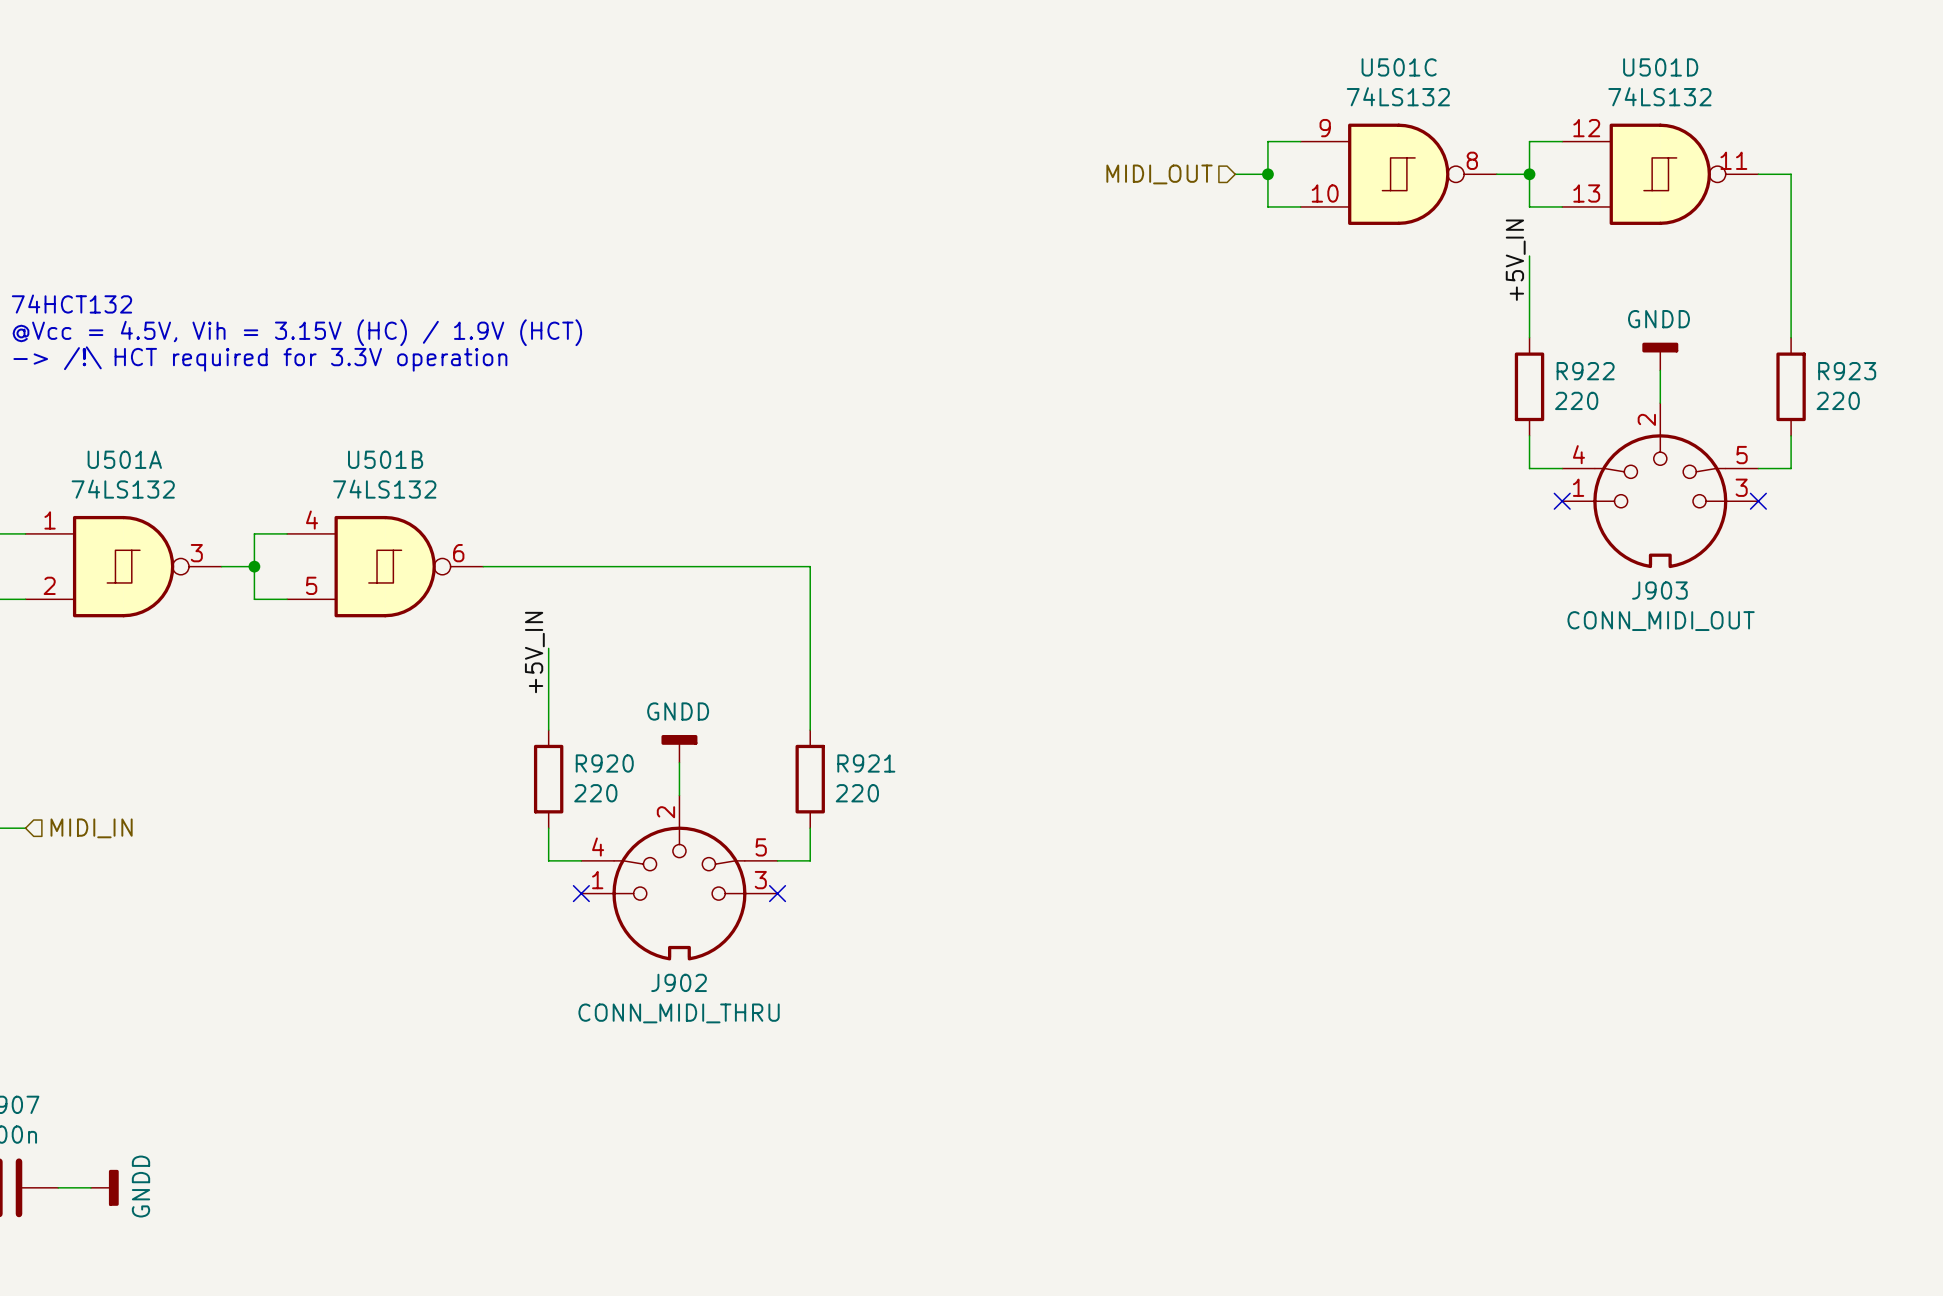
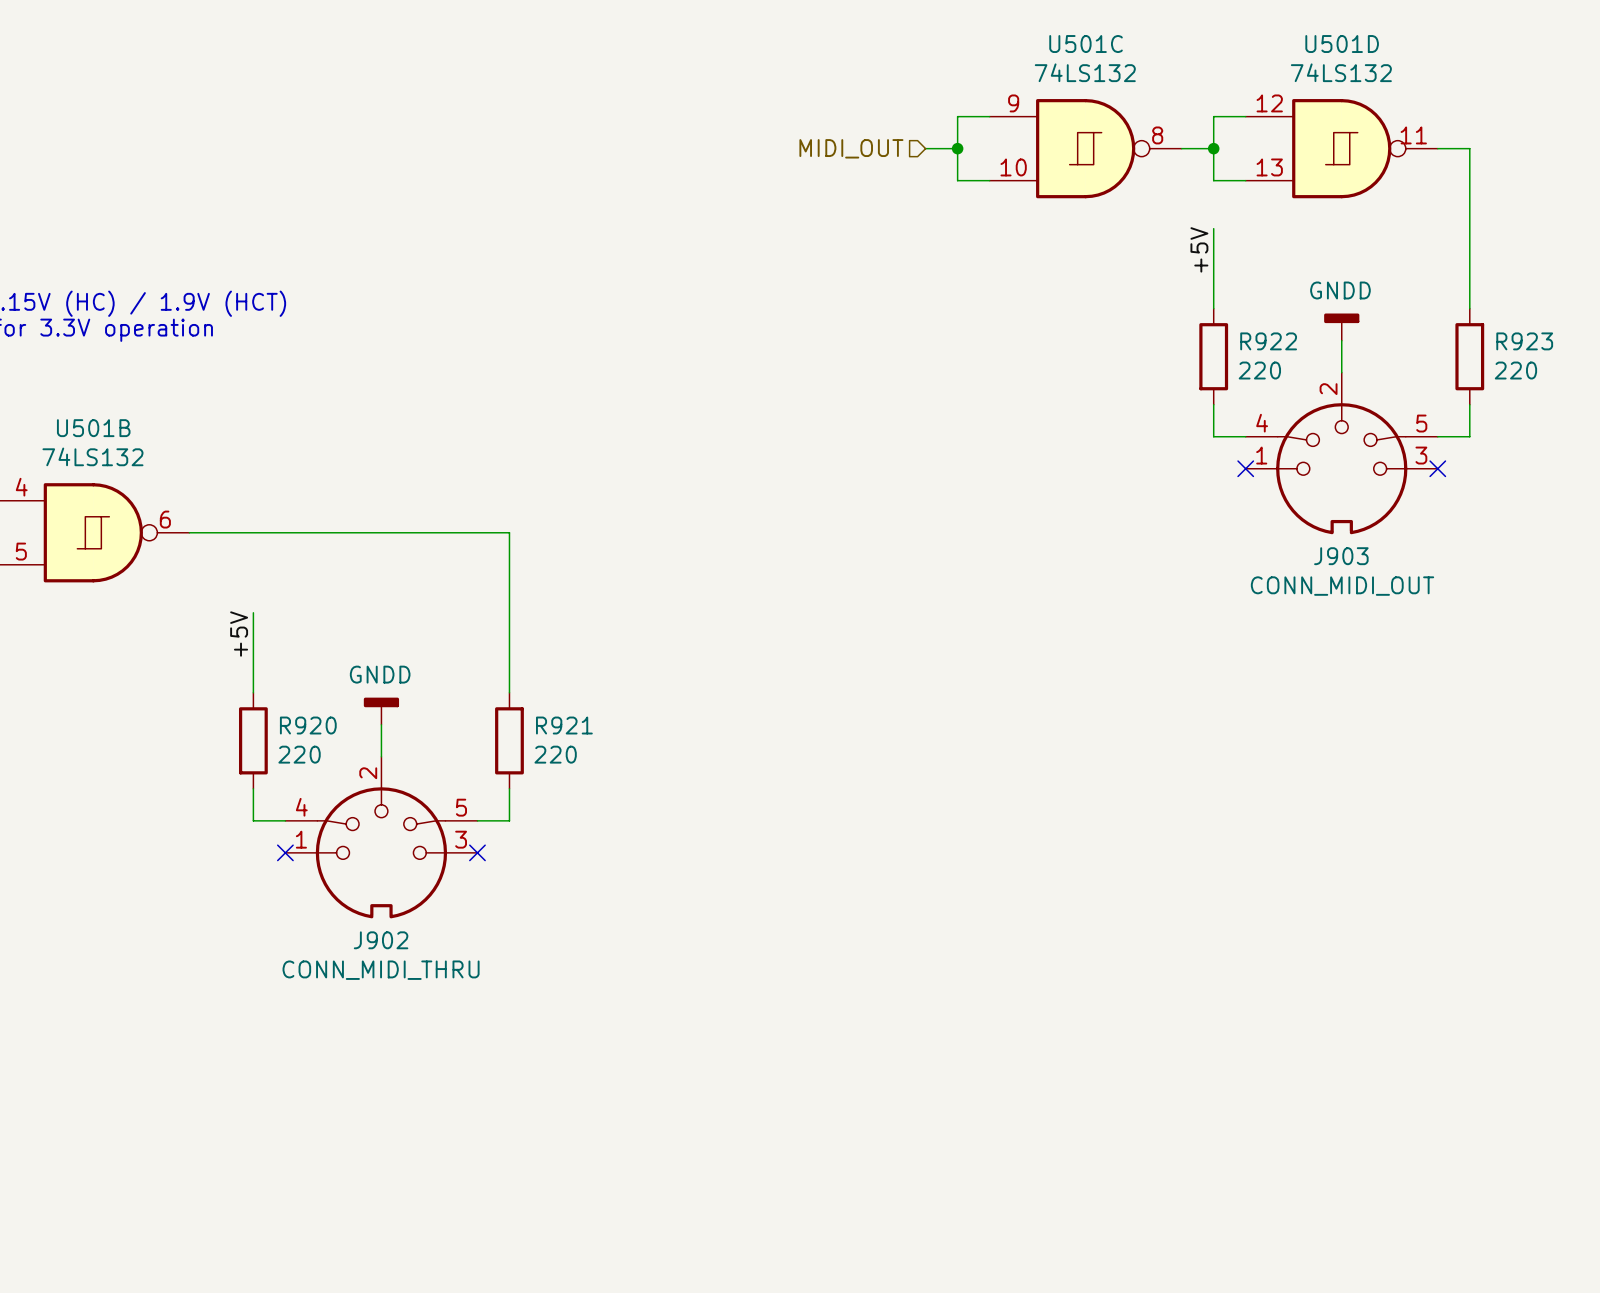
label: +5V_IN (1515, 260) -> +5V (1199, 249)
label: +5V_IN (534, 652) -> +5V (239, 634)

